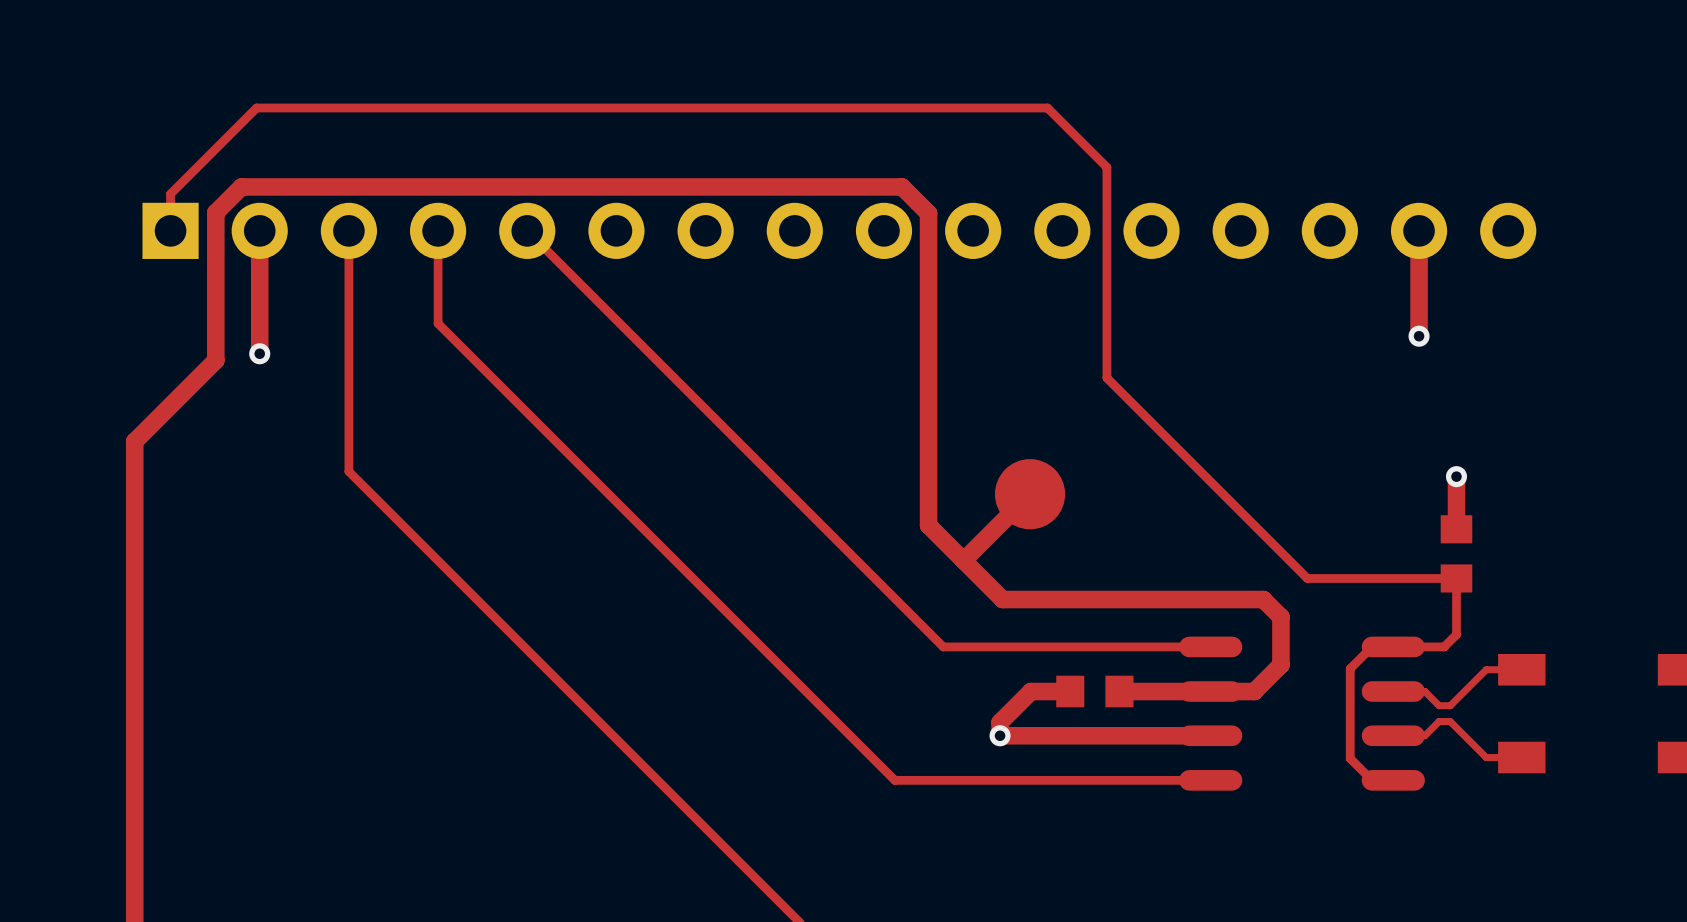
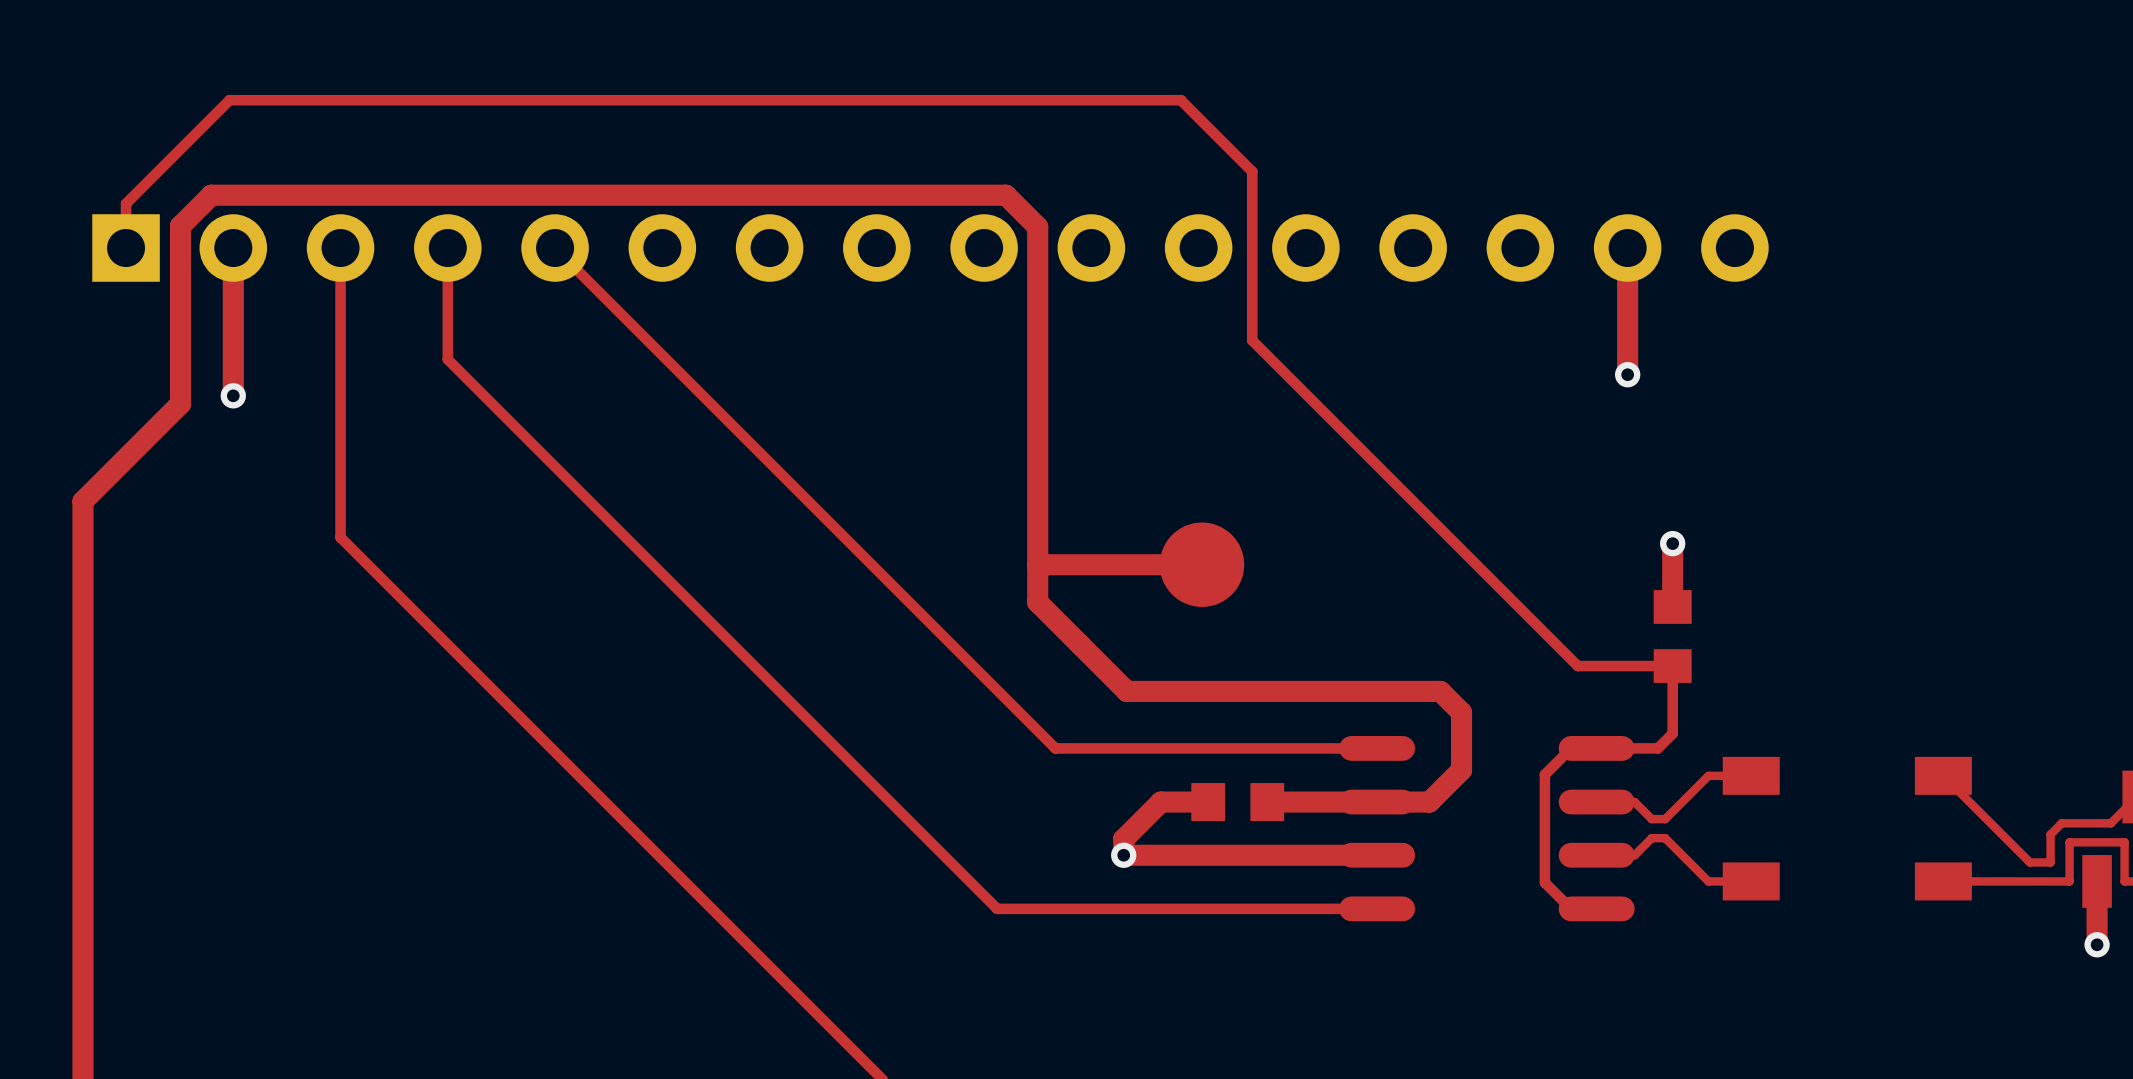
top track: (1106, 307) (1106, 377) (1307, 578) (1377, 578) -> (1252, 340) (1577, 666)
top track: (1030, 494) (963, 560) -> none
part position: (1030, 494) -> (1202, 564)
top track: none -> (1202, 564) (1037, 564)

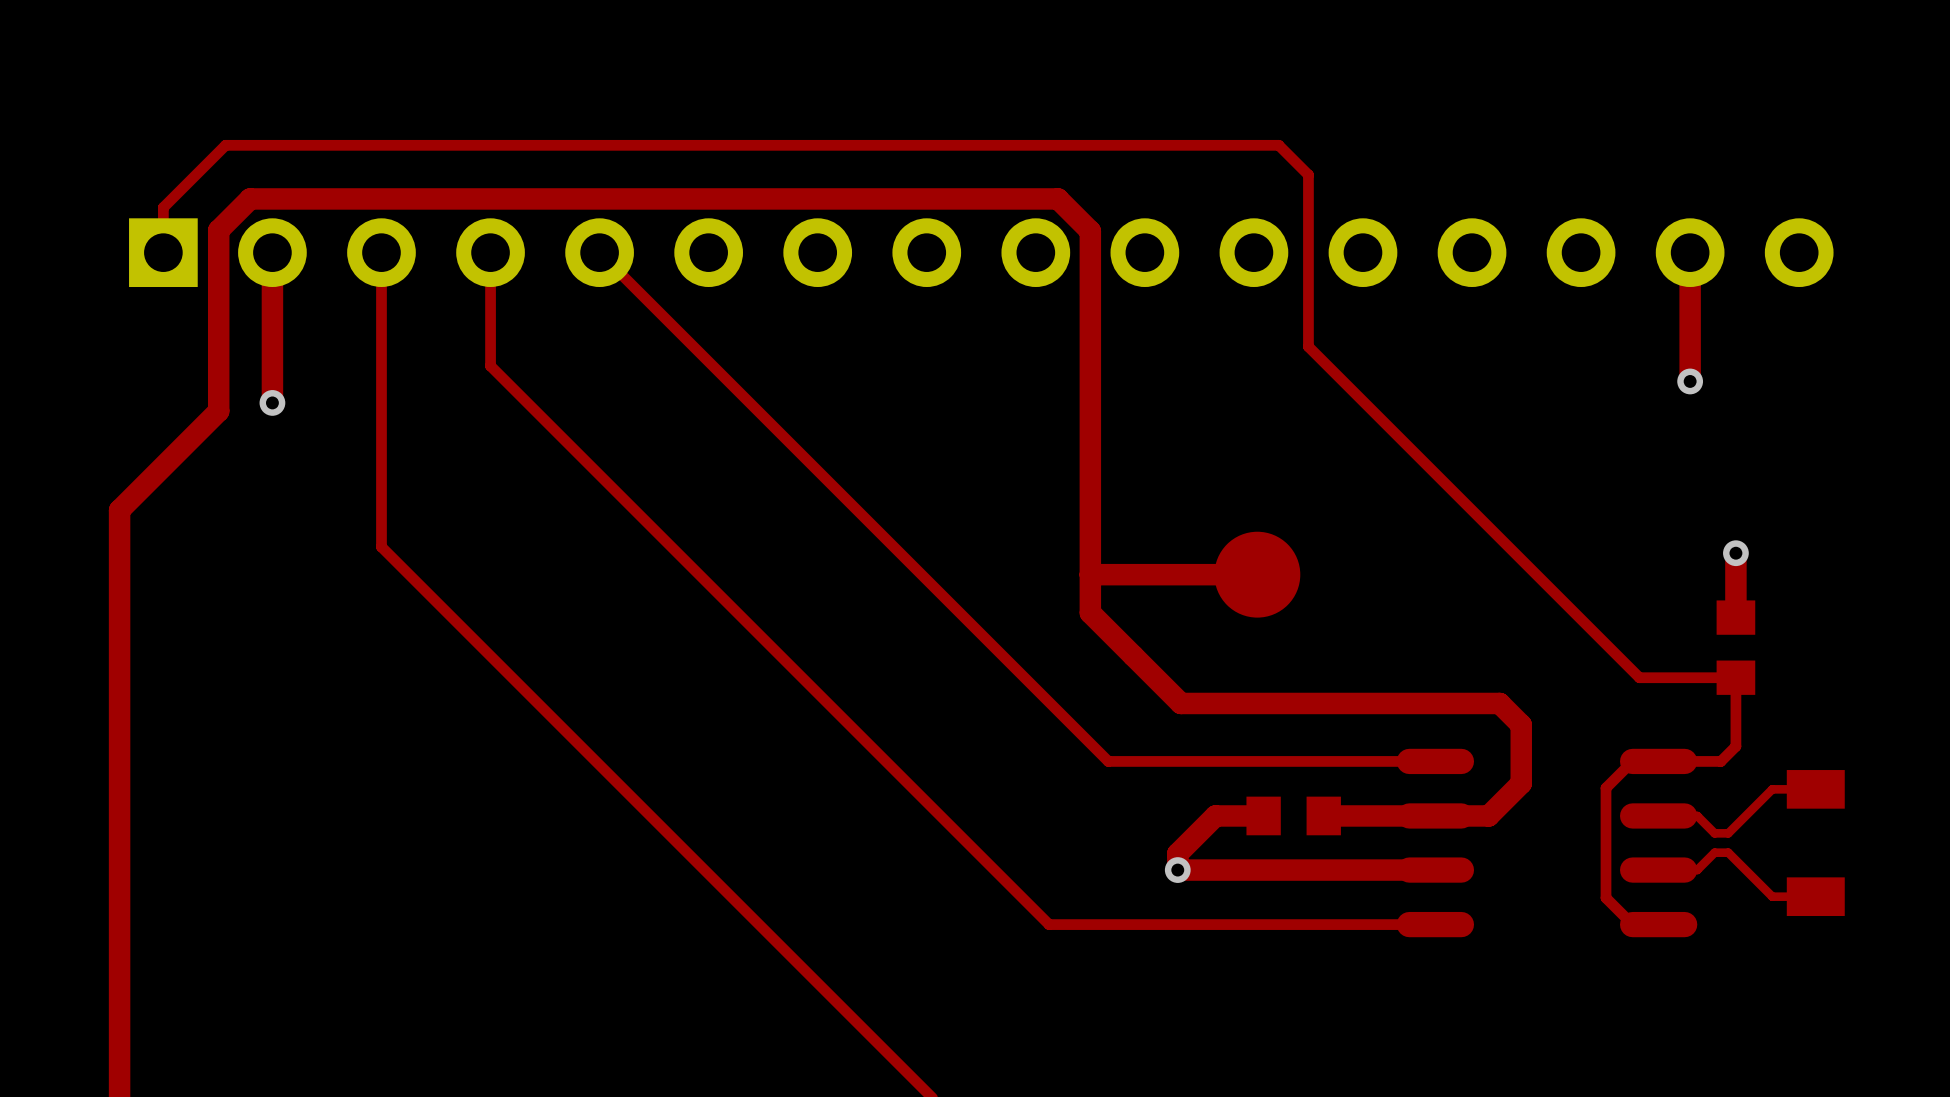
top track: (1223, 142) (1180, 100) (229, 100) (187, 142) -> (1278, 145) (225, 145)

